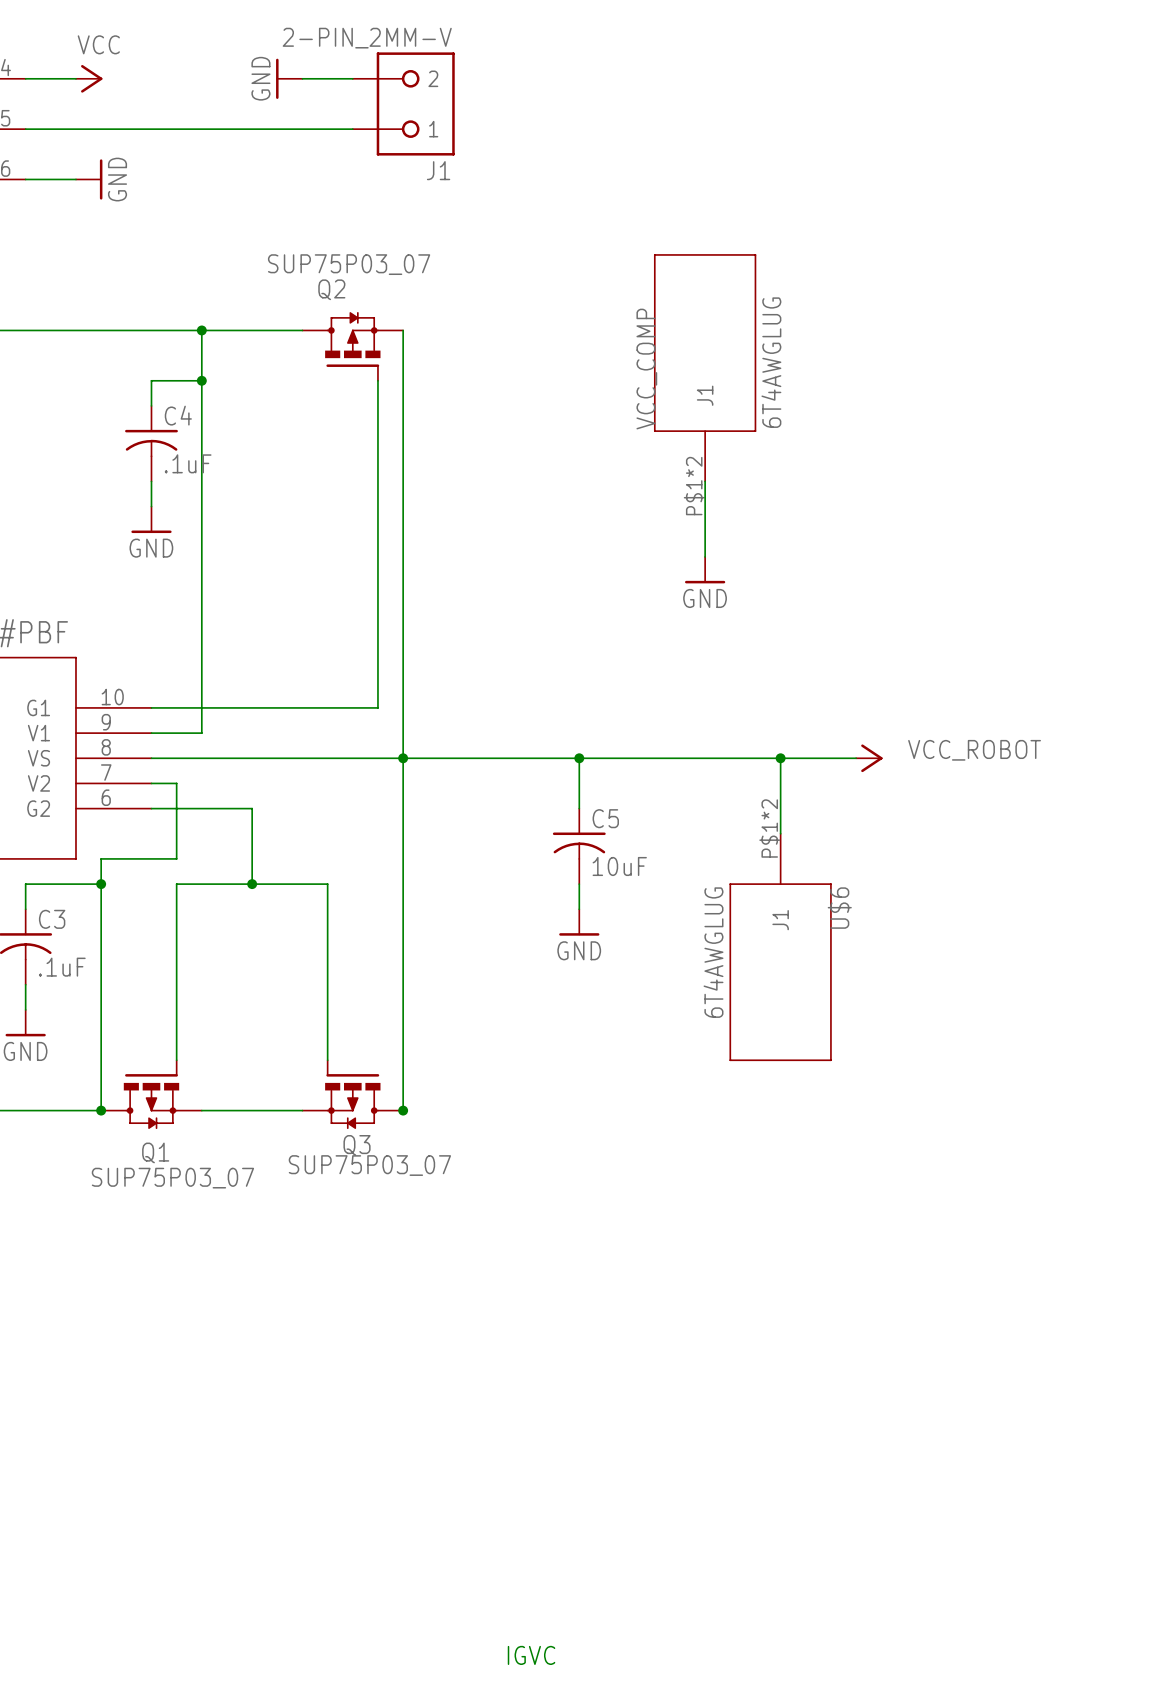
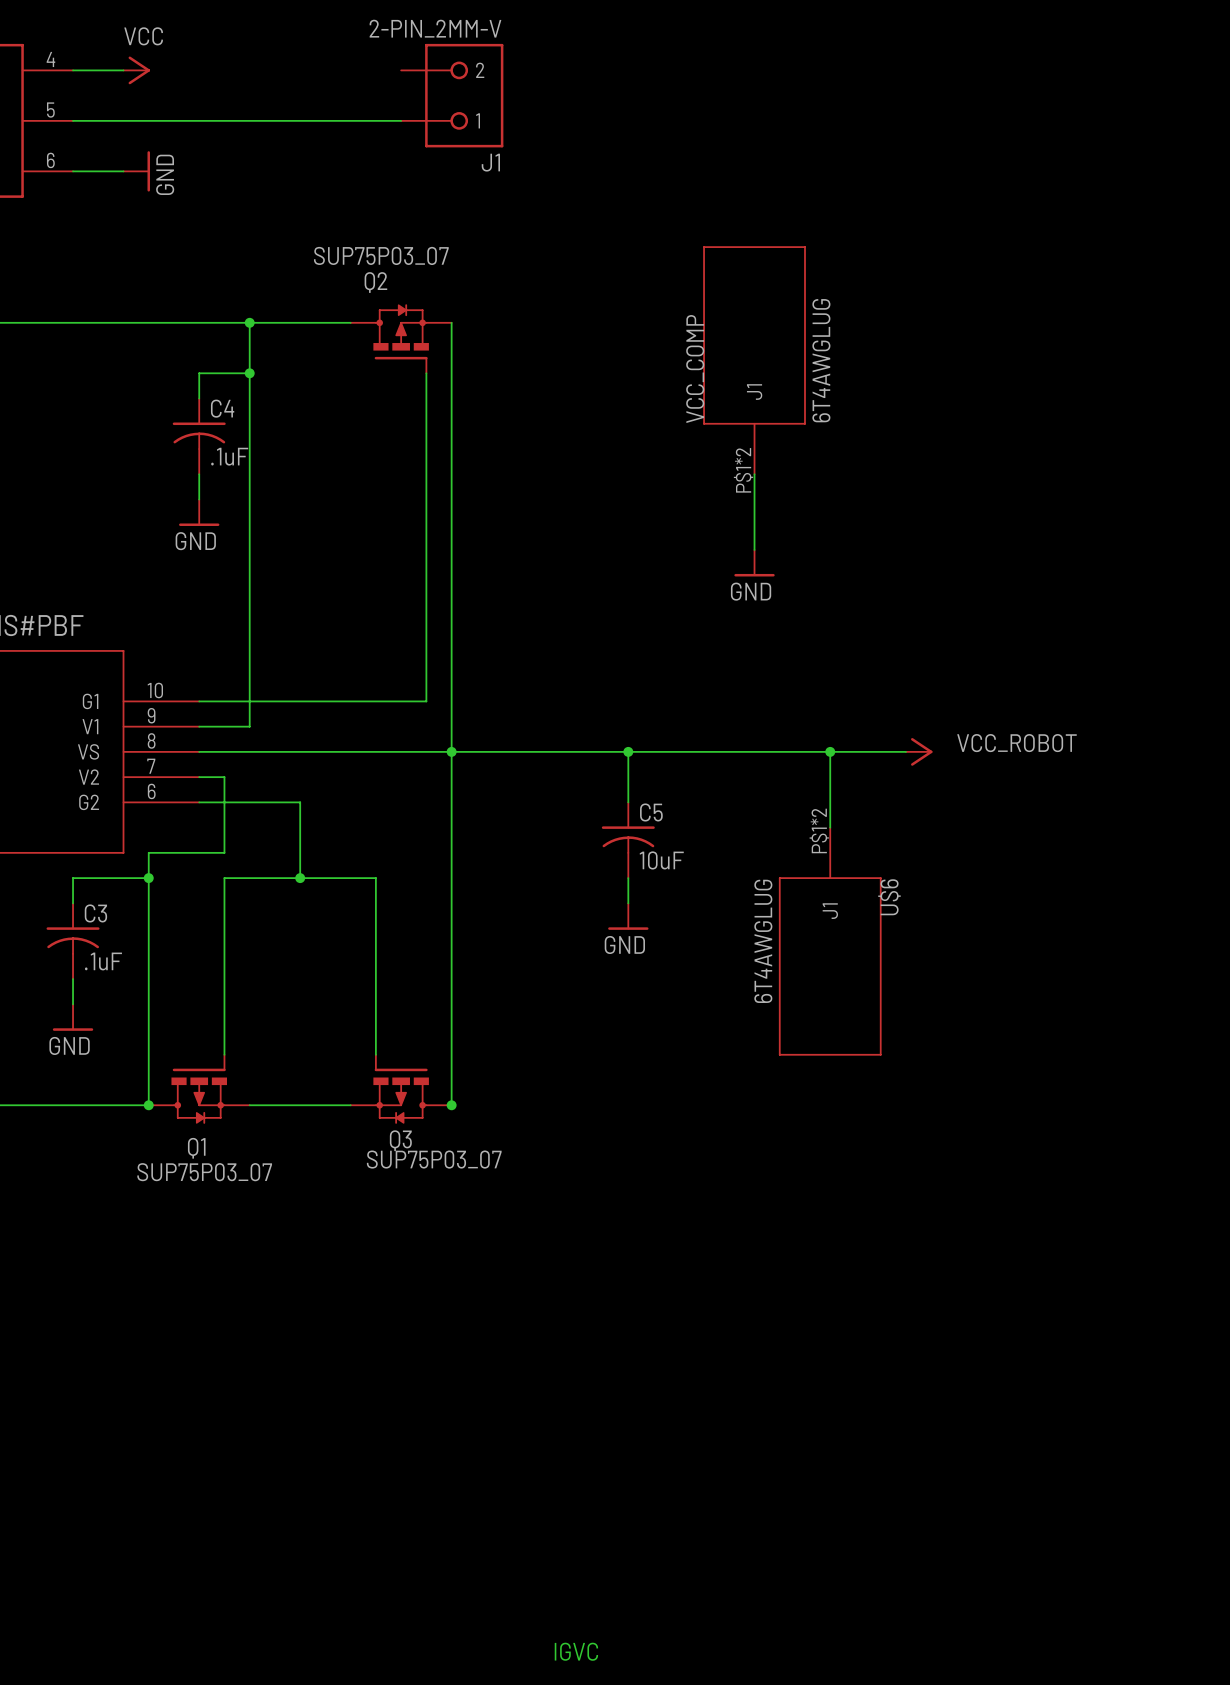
power symbol: GND (289, 78) -> none
wire: (302, 78) (352, 78) -> none

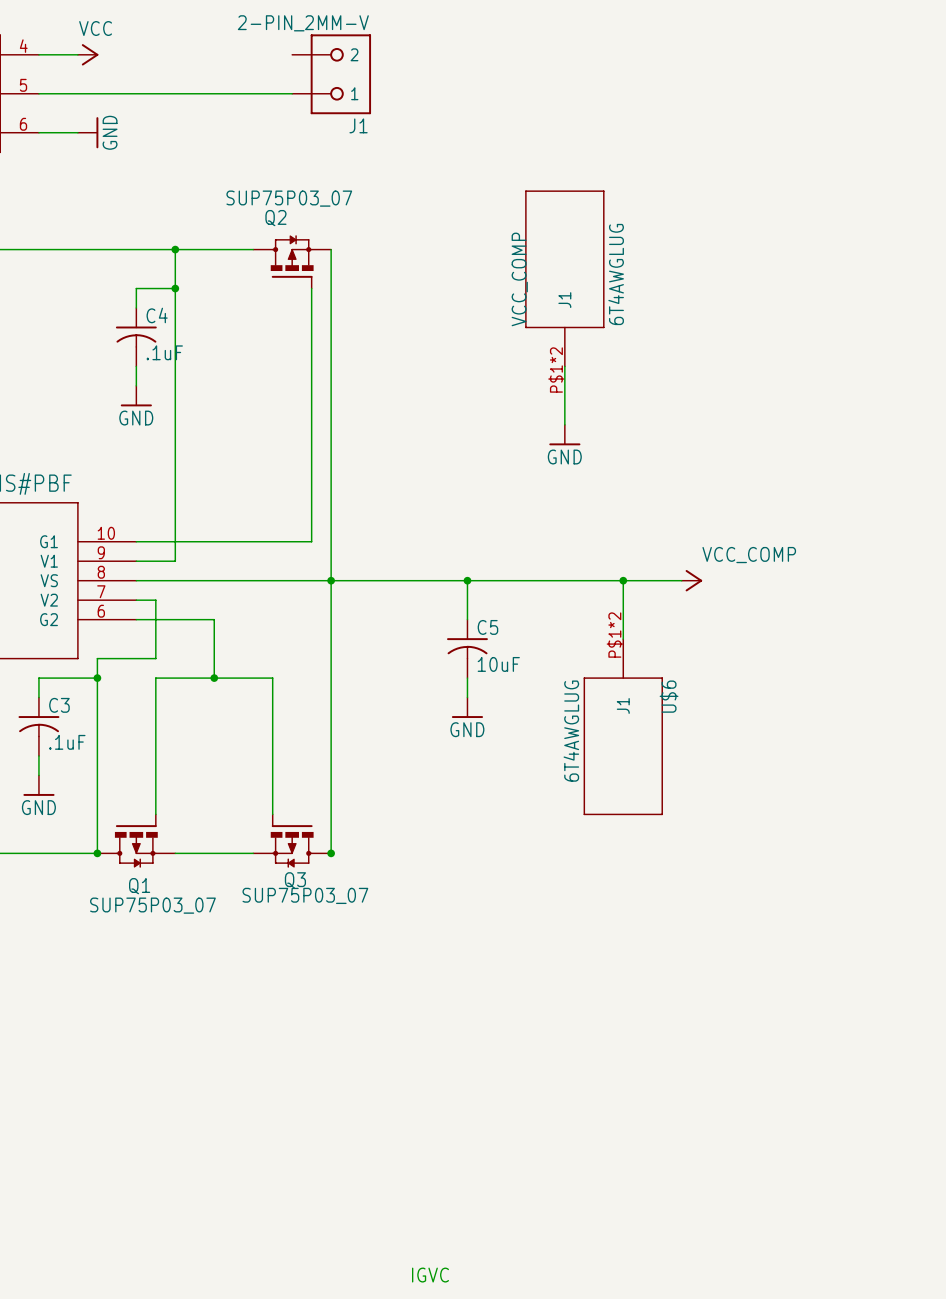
power symbol text: none -> VCC_COMP (749, 555)
label: VCC_ROBOT (1016, 743) -> none

